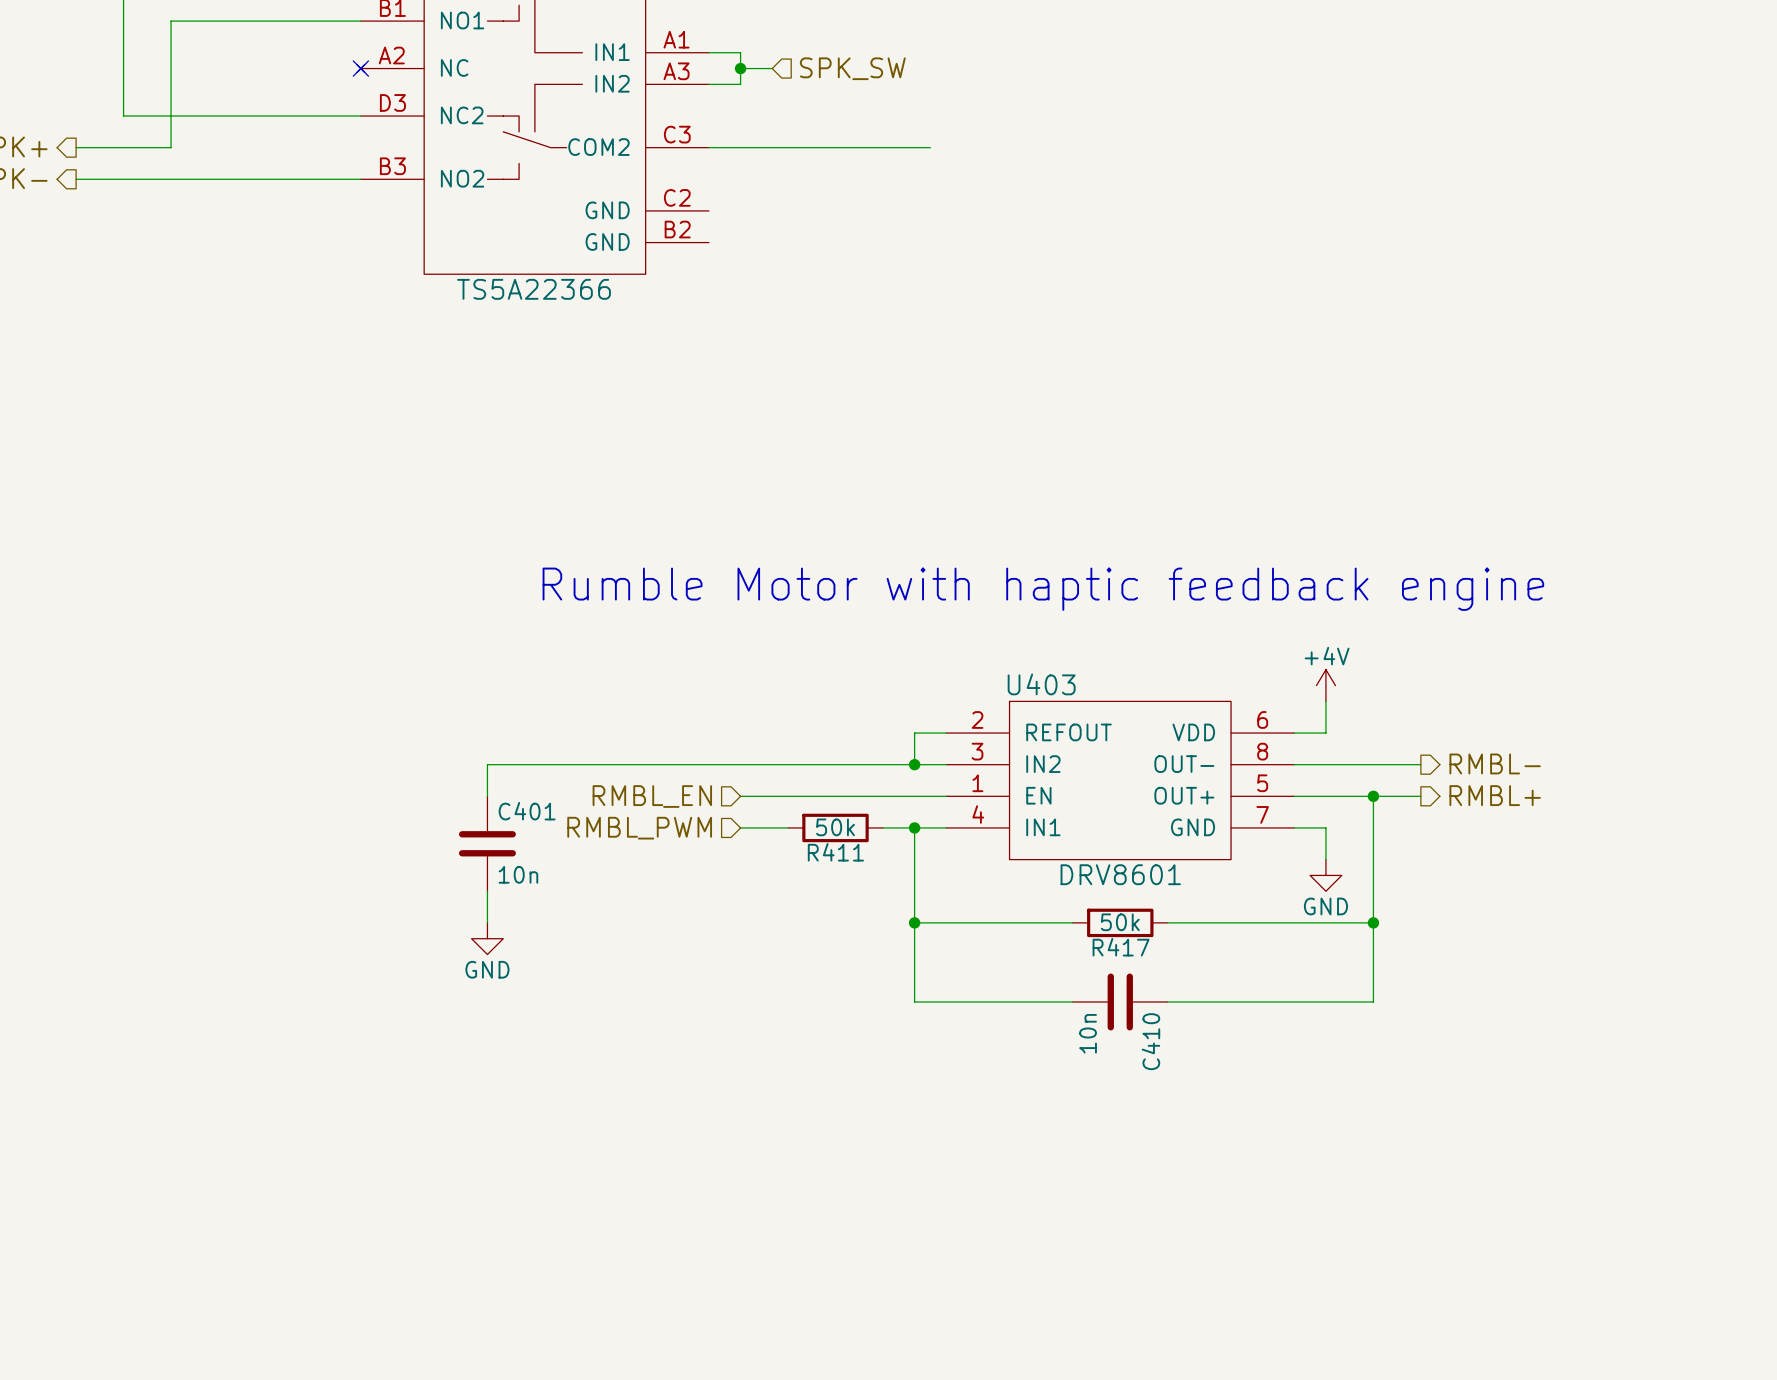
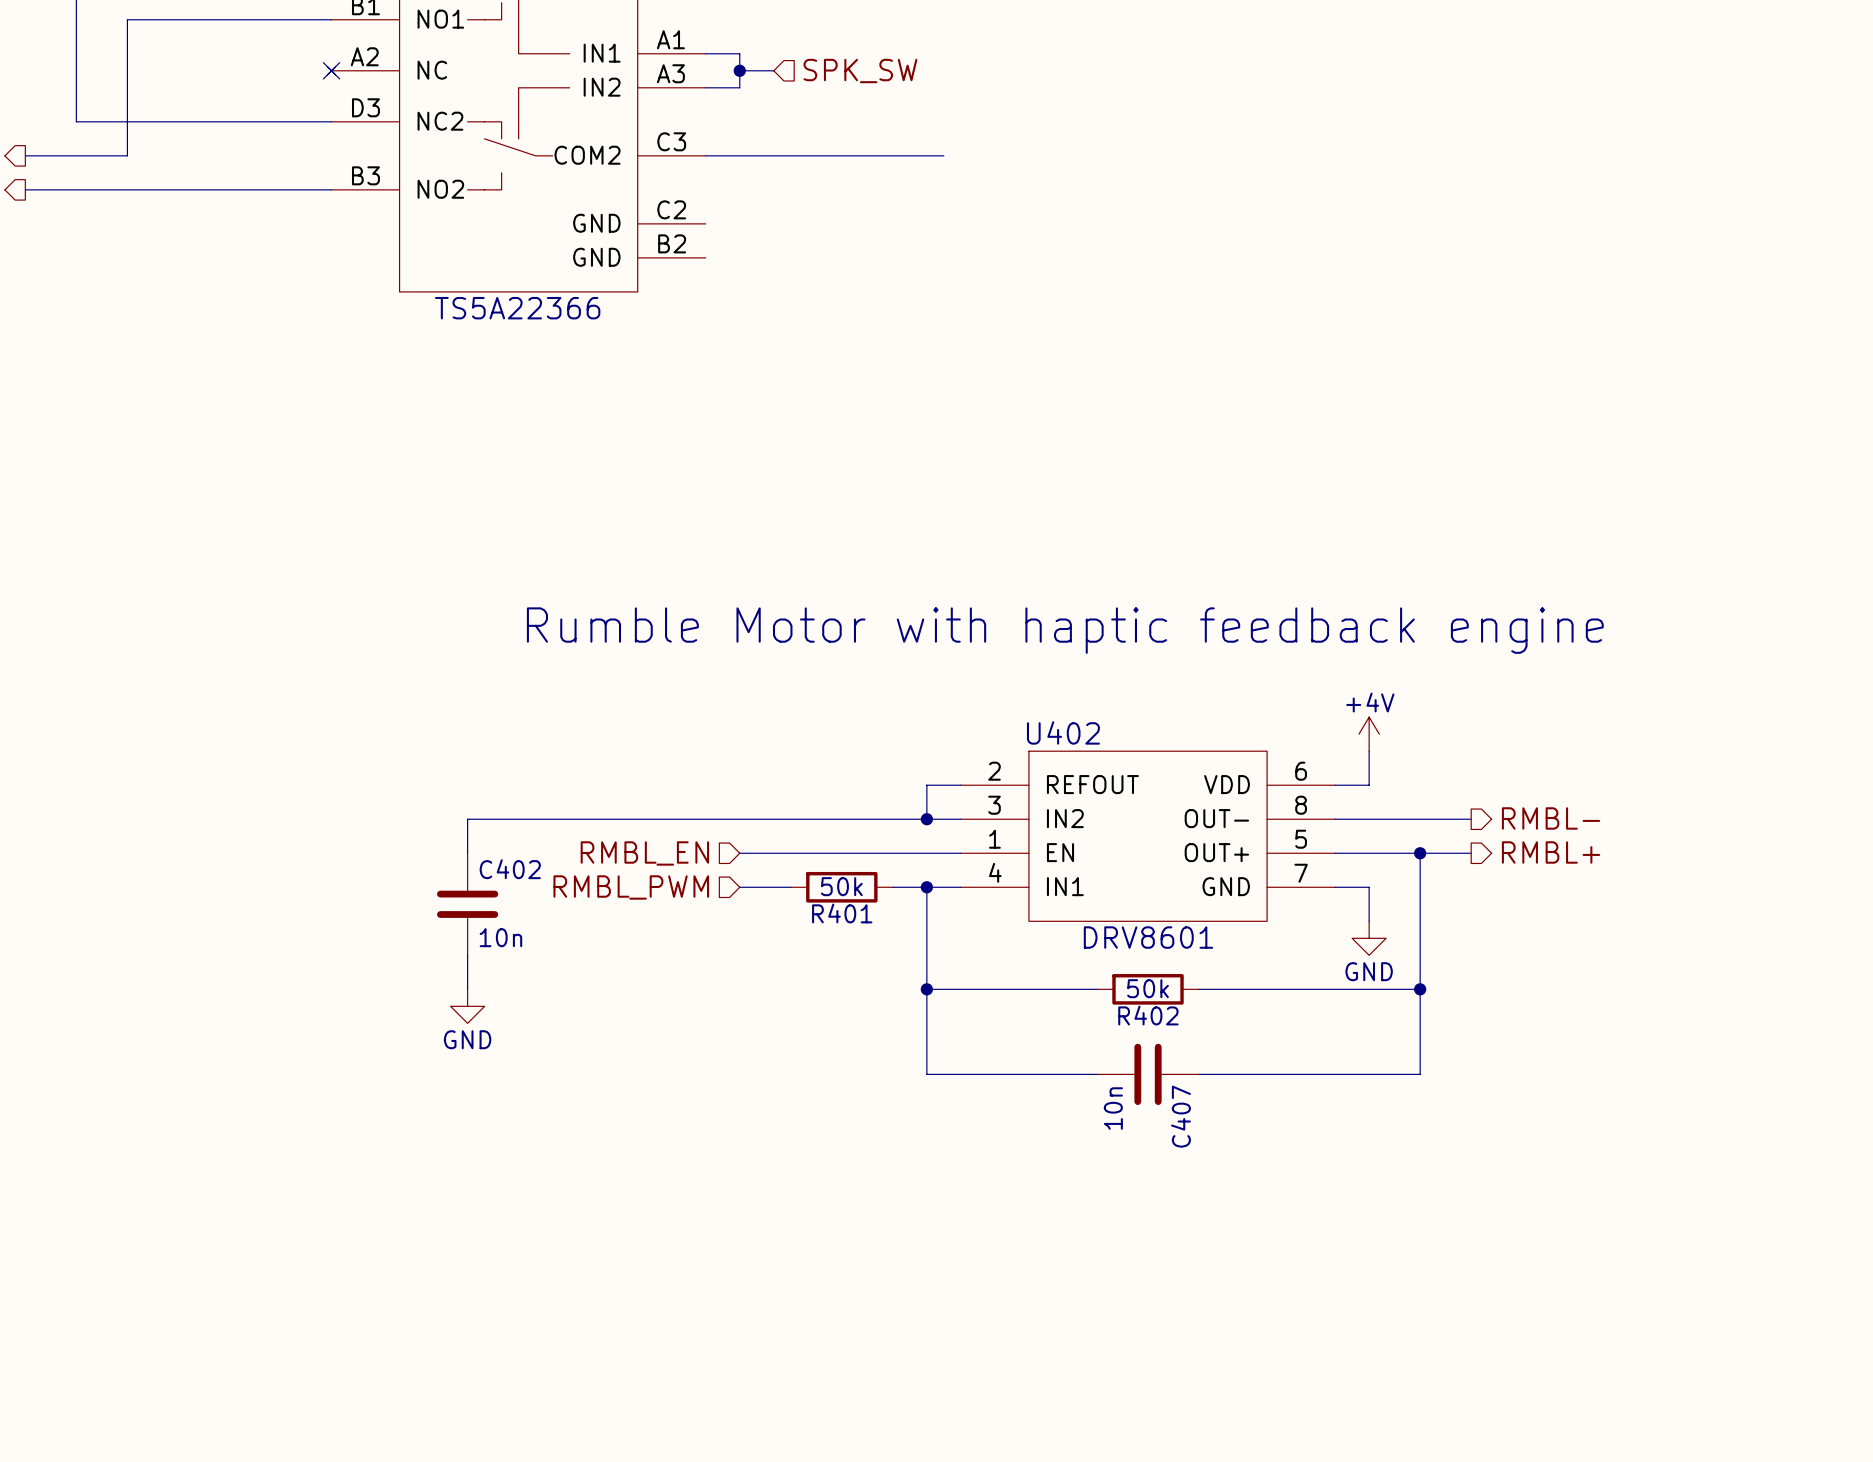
U403 name: U403 (1041, 684) -> U402 (1063, 732)
C401 name: C401 (527, 811) -> C402 (510, 869)
R411 name: R411 (835, 852) -> R401 (842, 913)
R417 name: R417 (1121, 947) -> R402 (1148, 1015)
C410 name: C410 (1150, 1041) -> C407 (1180, 1116)

